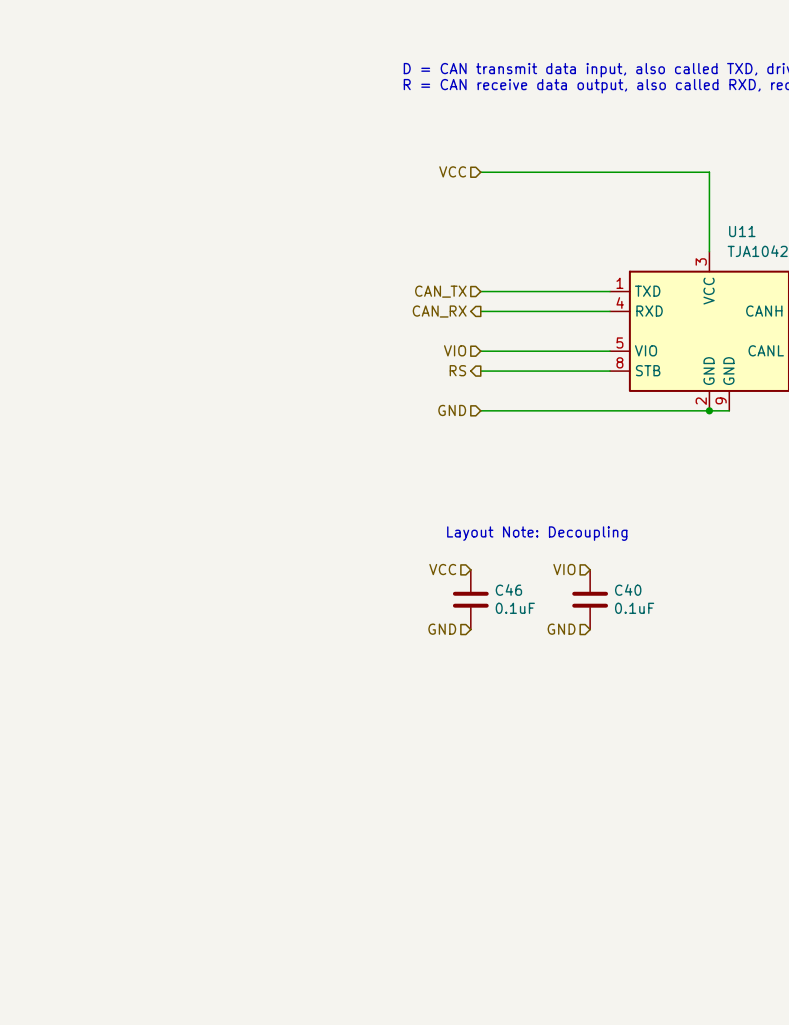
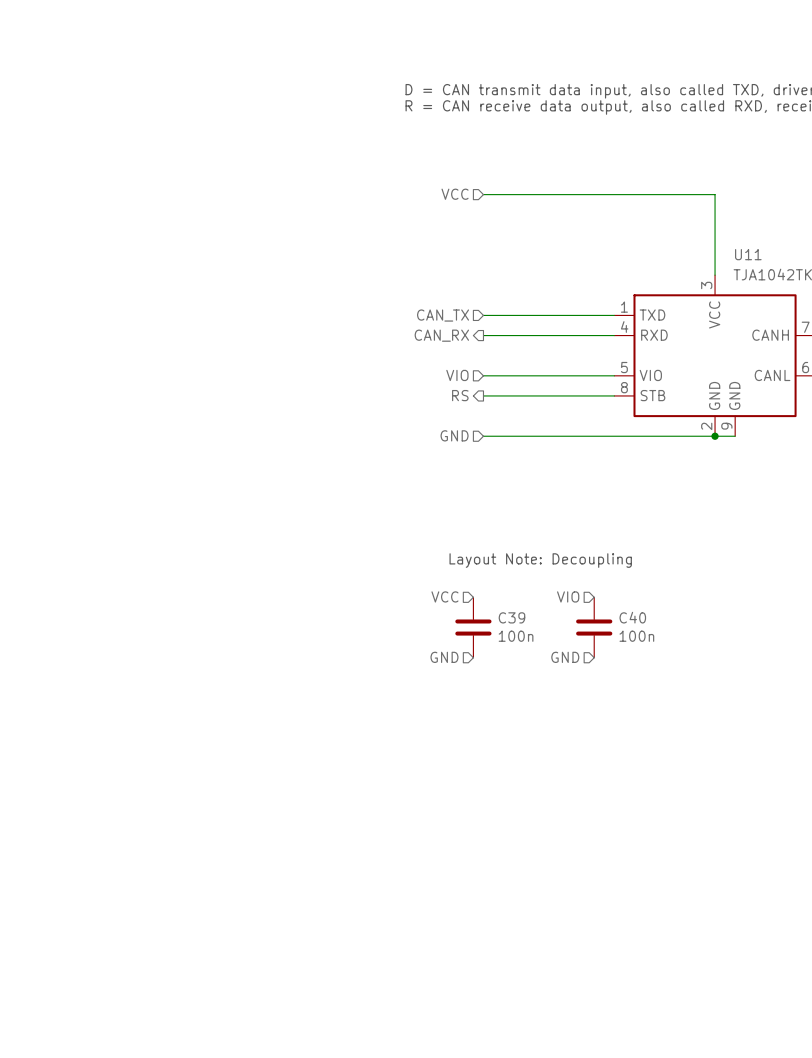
C46 name: C46 (508, 589) -> C39 (511, 617)
C46 value: 0.1uF (515, 608) -> 100n (516, 636)
C40 value: 0.1uF (634, 608) -> 100n (636, 636)

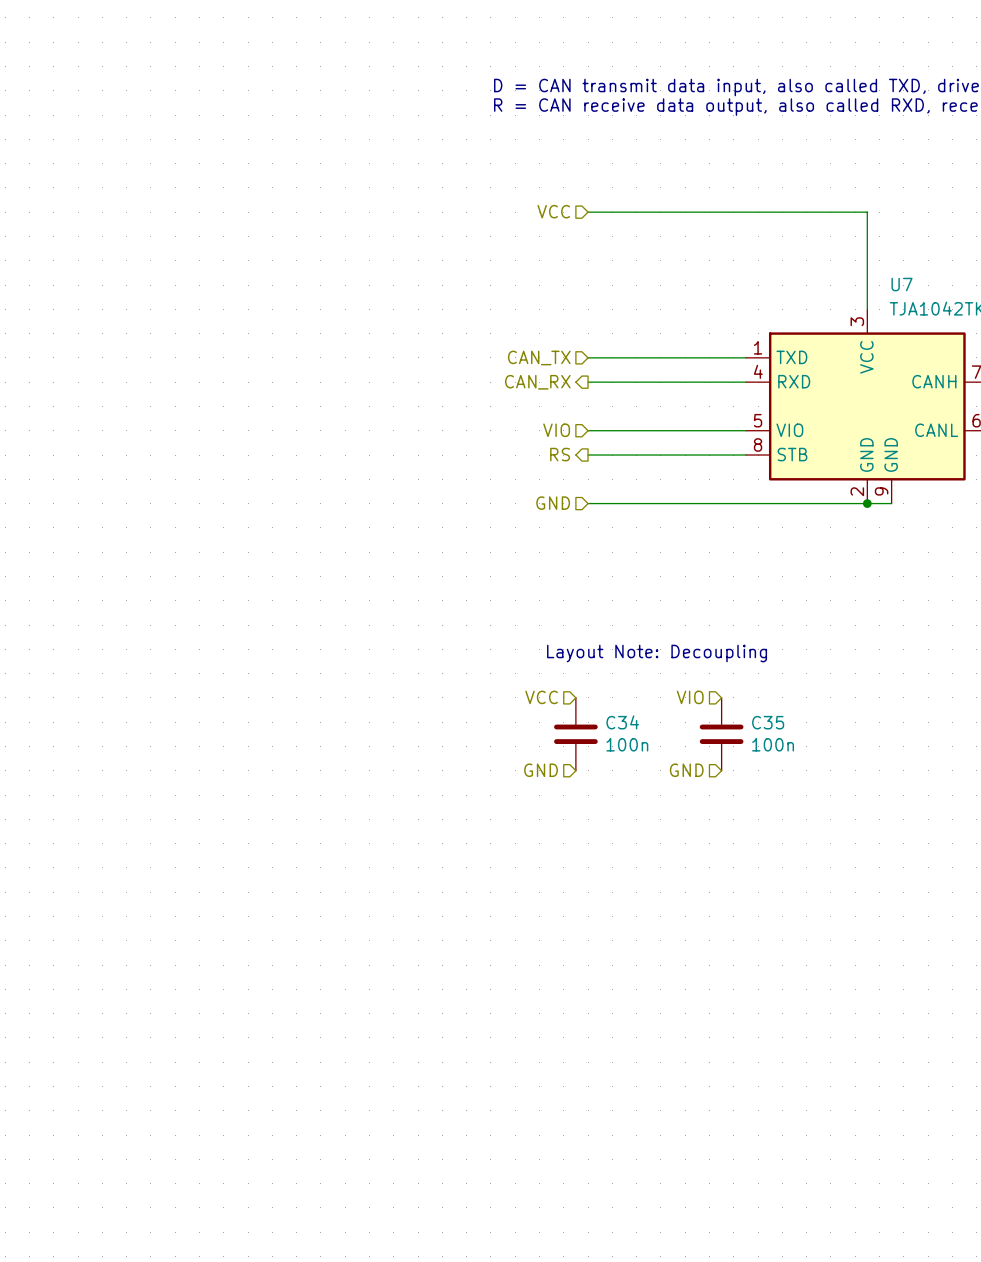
U11 name: U11 (748, 254) -> U7 (901, 284)
C39 name: C39 (511, 617) -> C34 (622, 722)
C40 name: C40 (632, 617) -> C35 (768, 722)

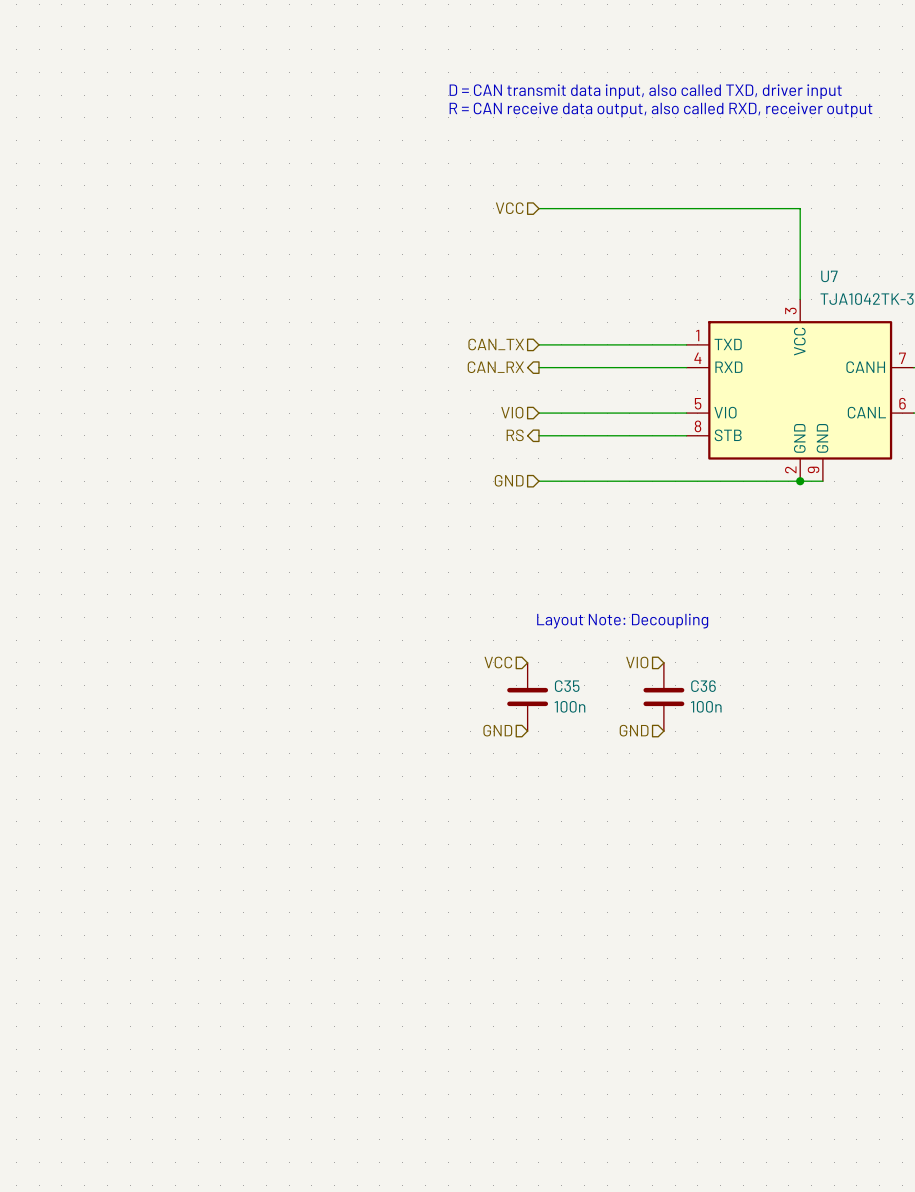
C34 name: C34 (622, 722) -> C35 (567, 686)
C35 name: C35 (768, 722) -> C36 (703, 686)

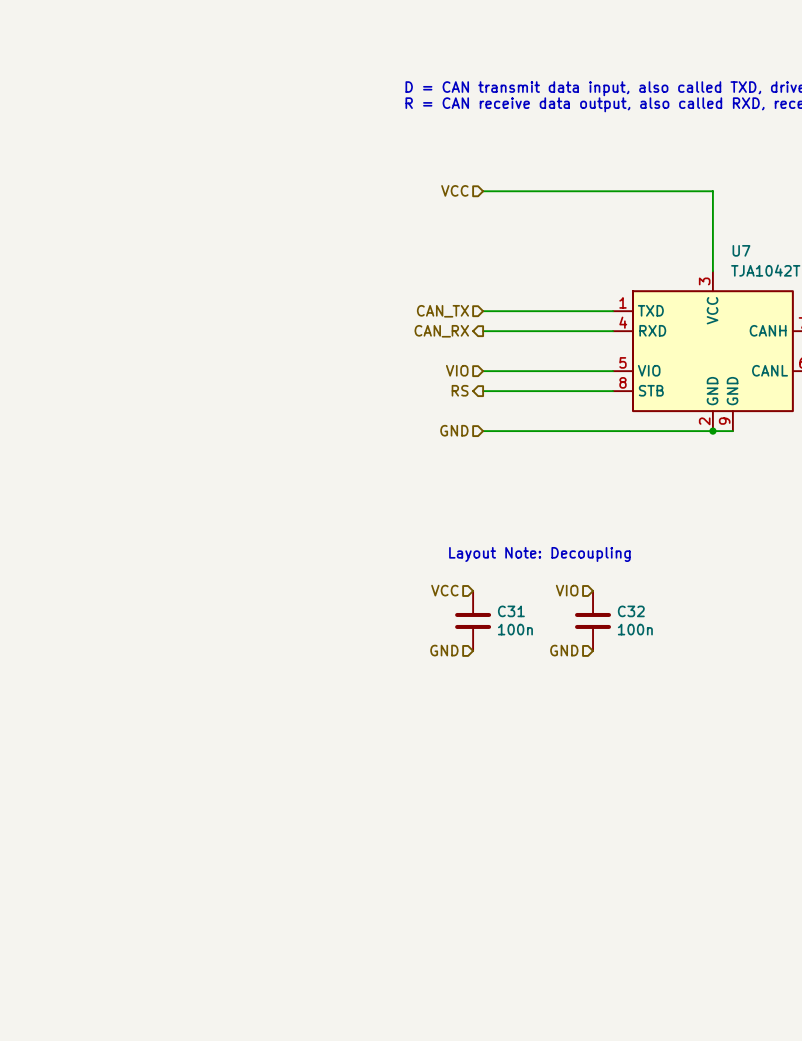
C35 name: C35 (567, 686) -> C31 (511, 611)
C36 name: C36 (703, 686) -> C32 (631, 611)

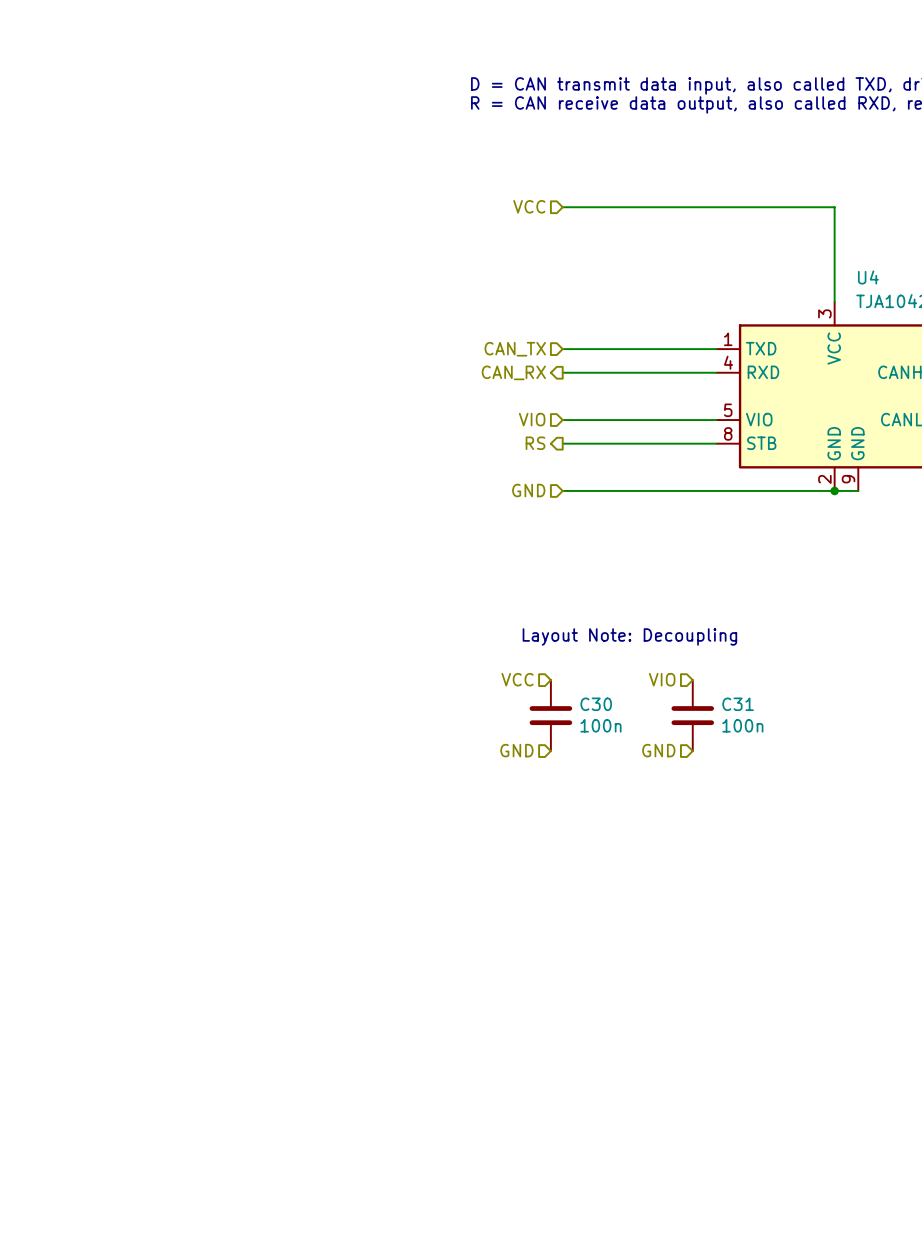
U7 name: U7 (741, 250) -> U4 (868, 277)
C31 name: C31 (511, 611) -> C30 (596, 704)
C32 name: C32 (631, 611) -> C31 (738, 704)

